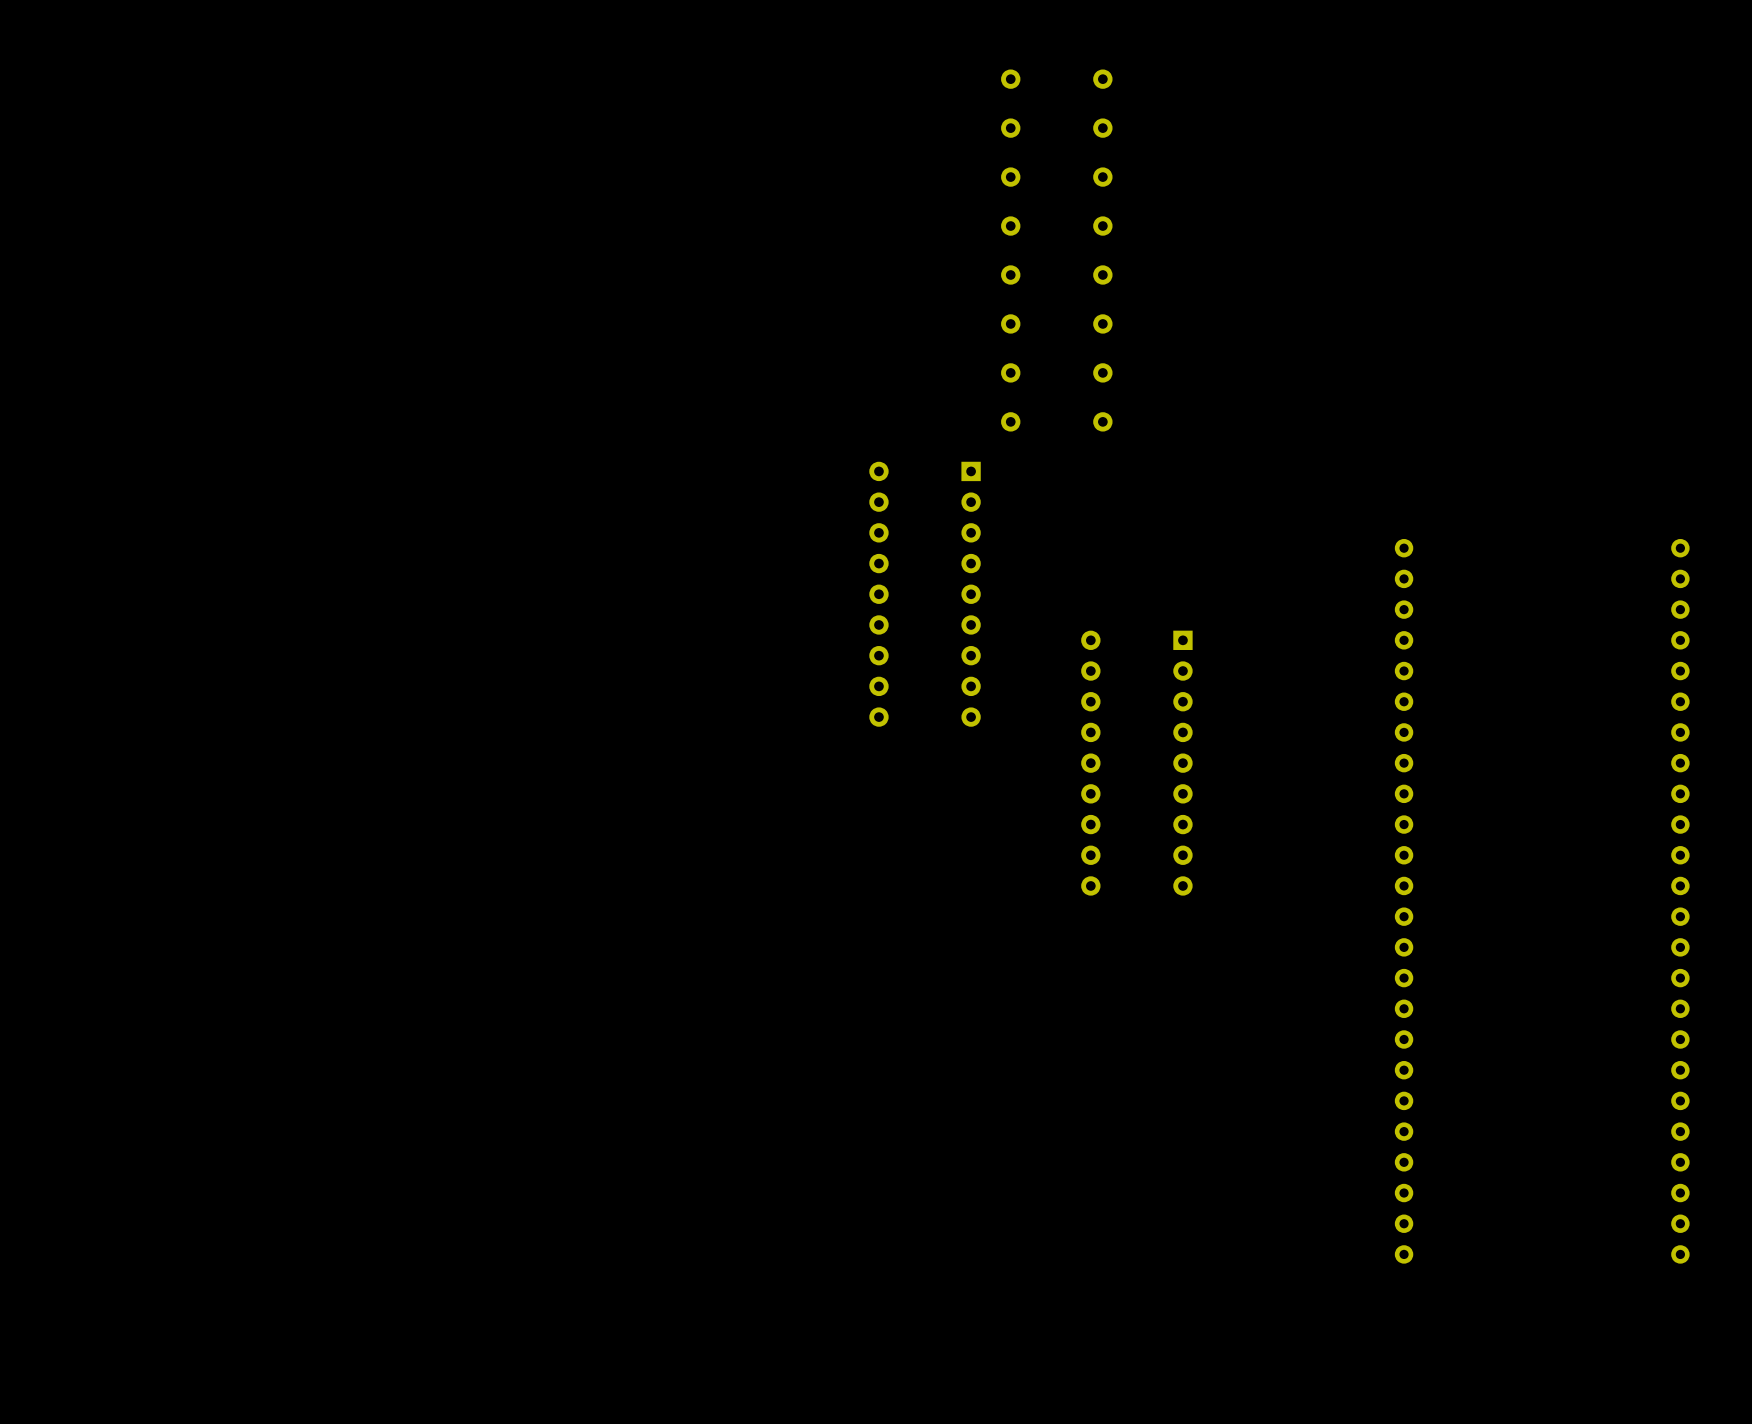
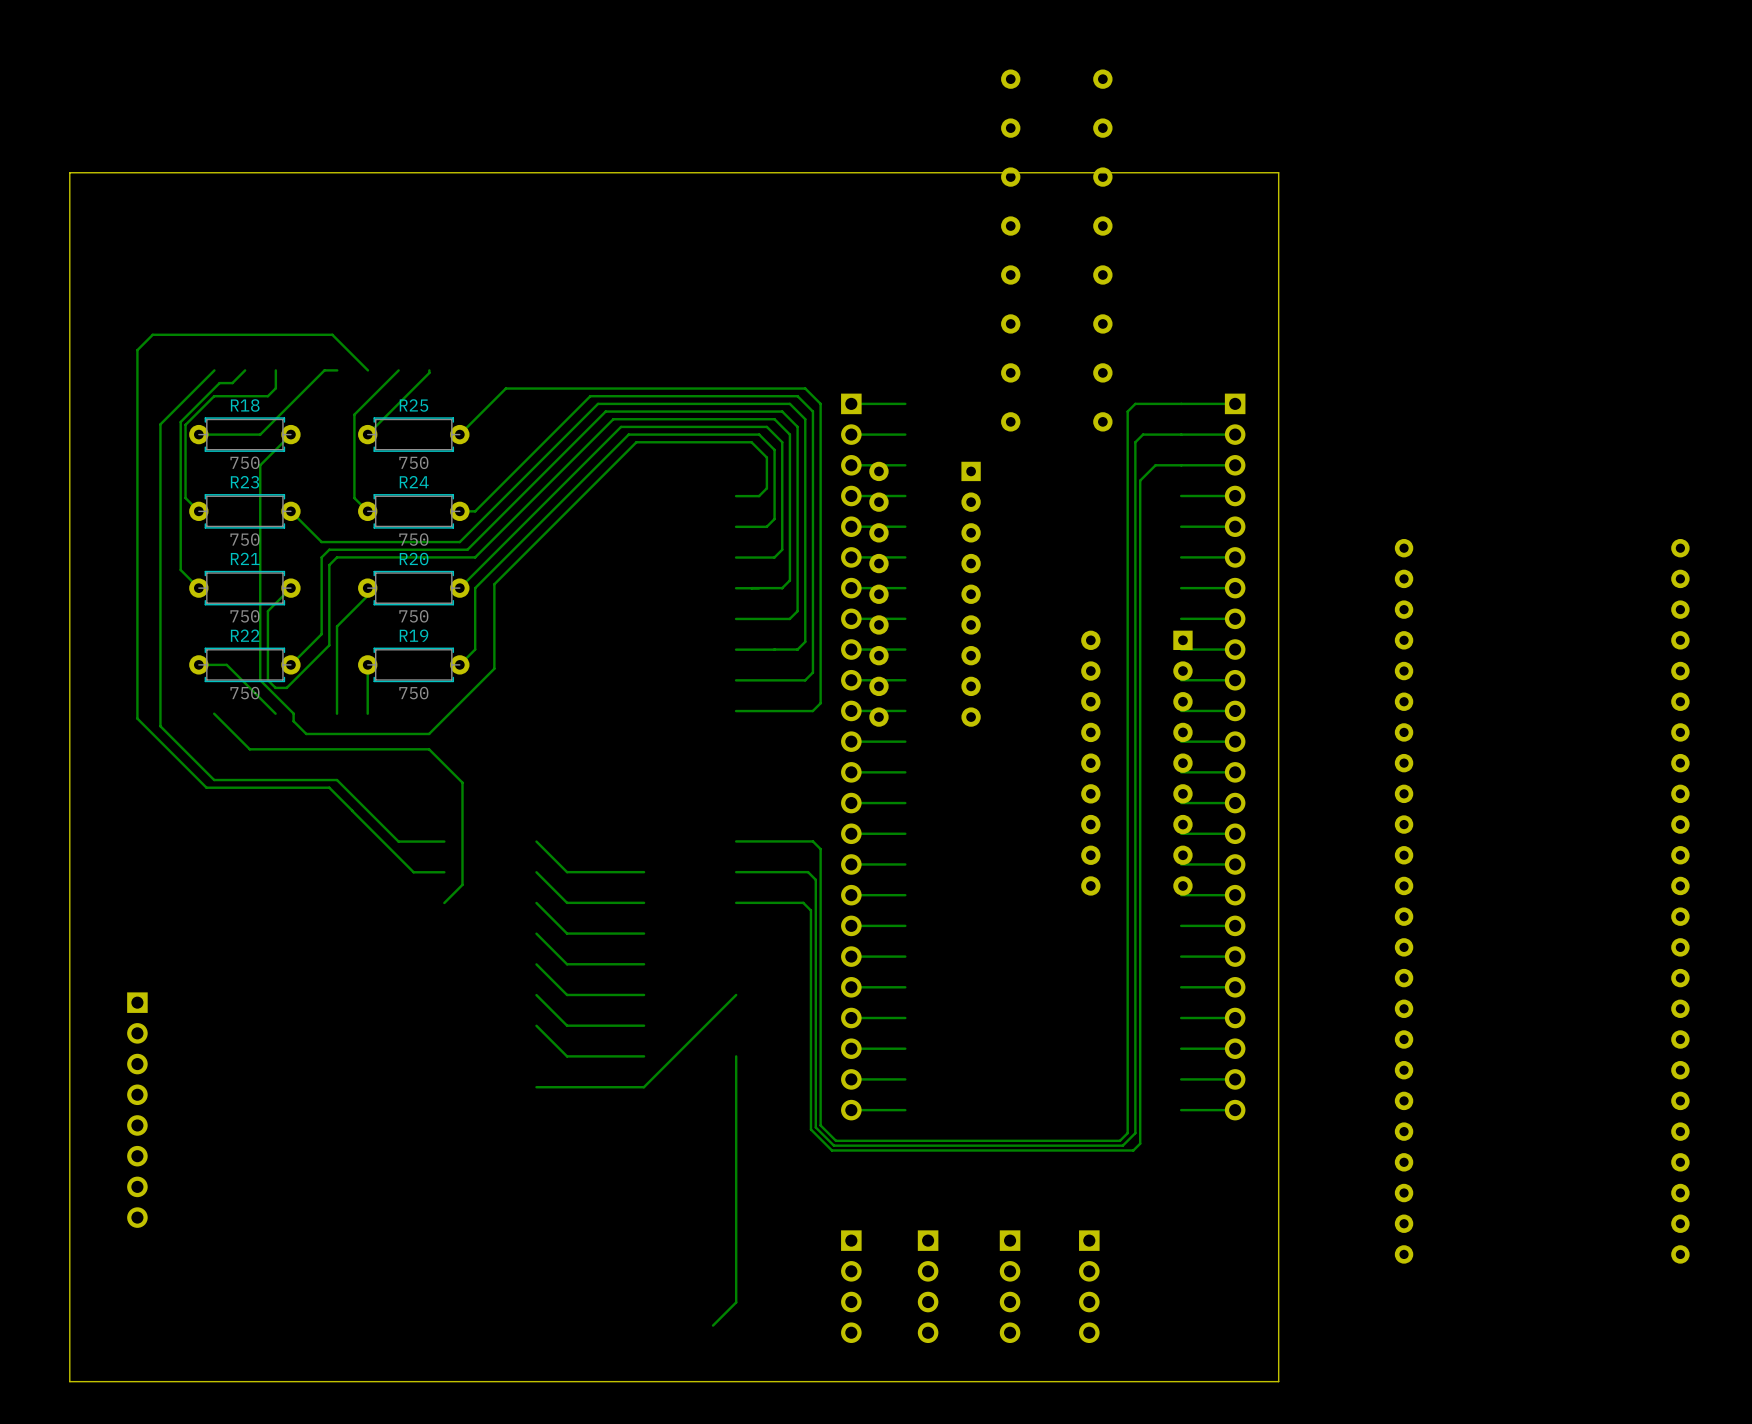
board edge: none -> (1278, 172) (69, 172) (69, 1381) (1278, 1381) (1278, 172)
track: none -> (214, 370) (160, 424) (160, 726) (214, 780) (337, 780) (398, 841) (444, 841)
track: none -> (245, 370) (232, 383) (219, 383) (180, 422) (180, 569) (198, 588)
track: none -> (275, 370) (275, 388) (267, 396) (214, 396) (185, 424) (185, 498) (198, 511)
track: none -> (337, 370) (324, 370) (260, 434) (198, 434)
track: none -> (367, 370) (332, 334) (152, 334) (137, 350) (137, 718) (206, 787) (329, 787) (413, 872) (444, 872)
track: none -> (398, 370) (354, 414) (354, 498) (367, 511)
track: none -> (429, 370) (429, 372) (367, 434)
track: none -> (905, 403) (851, 403)
track: none -> (1235, 403) (1135, 403) (1127, 411) (1127, 1133) (1120, 1140) (835, 1140) (820, 1125) (820, 849) (812, 841) (736, 841)
R18: none -> 750 (244, 434)
track: none -> (290, 434) (260, 465) (260, 680) (293, 713) (293, 721) (306, 733) (429, 733) (494, 668) (494, 584) (636, 442) (751, 442) (766, 457) (766, 488) (759, 496) (736, 496)
R25: none -> 750 (413, 434)
track: none -> (459, 434) (505, 388) (805, 388) (820, 403) (820, 703) (812, 711) (736, 711)
track: none -> (905, 434) (851, 434)
track: none -> (1235, 434) (1143, 434) (1135, 442) (1135, 1133) (1122, 1145) (833, 1145) (815, 1127) (815, 879) (808, 872) (736, 872)
track: none -> (905, 465) (851, 465)
track: none -> (1235, 465) (1155, 465) (1140, 480) (1140, 1143) (1133, 1150) (831, 1150) (810, 1129) (810, 910) (803, 902) (736, 902)
track: none -> (905, 496) (851, 496)
track: none -> (1235, 496) (1181, 496)
R23: none -> 750 (244, 511)
track: none -> (290, 511) (321, 542) (459, 542) (598, 403) (789, 403) (805, 419) (805, 641) (797, 649)
R24: none -> 750 (413, 511)
track: none -> (459, 511) (475, 511) (590, 396) (797, 396) (812, 411) (812, 672) (805, 680) (736, 680)
track: none -> (736, 526) (766, 526) (774, 519) (774, 449) (759, 434) (628, 434) (475, 588) (475, 649) (459, 664)
track: none -> (905, 526) (851, 526)
track: none -> (1235, 526) (1181, 526)
track: none -> (736, 557) (774, 557) (782, 549) (782, 442) (766, 426) (621, 426) (459, 588)
track: none -> (905, 557) (851, 557)
track: none -> (1235, 557) (1181, 557)
R21: none -> 750 (244, 588)
track: none -> (290, 588) (267, 611) (267, 680) (275, 687) (286, 687) (329, 645) (329, 565) (337, 557) (475, 557) (613, 419) (774, 419) (789, 434) (789, 580) (782, 588)
track: none -> (367, 588) (367, 595) (337, 626) (337, 713)
R20: none -> 750 (413, 588)
track: none -> (759, 588) (736, 588)
track: none -> (782, 588) (751, 588)
track: none -> (905, 588) (851, 588)
track: none -> (1235, 588) (1181, 588)
track: none -> (736, 618) (789, 618) (797, 611) (797, 426) (782, 411) (605, 411) (467, 549) (329, 549) (321, 557) (321, 634) (290, 664)
track: none -> (905, 618) (851, 618)
track: none -> (1235, 618) (1181, 618)
track: none -> (774, 649) (736, 649)
track: none -> (797, 649) (774, 649)
track: none -> (905, 649) (851, 649)
track: none -> (1235, 649) (1181, 649)
track: none -> (198, 664) (226, 664) (275, 713)
R22: none -> 750 (244, 664)
track: none -> (367, 664) (367, 713)
R19: none -> 750 (413, 664)
track: none -> (905, 680) (851, 680)
track: none -> (1235, 680) (1181, 680)
track: none -> (905, 710) (851, 710)
track: none -> (1235, 710) (1181, 710)
track: none -> (214, 713) (249, 749) (429, 749) (462, 782) (462, 884) (444, 902)
track: none -> (905, 741) (851, 741)
track: none -> (1235, 741) (1181, 741)
part: none -> (851, 757)
part: none -> (1235, 757)
track: none -> (905, 772) (851, 772)
track: none -> (1235, 772) (1181, 772)
track: none -> (905, 803) (851, 803)
track: none -> (1235, 803) (1181, 803)
track: none -> (905, 833) (851, 833)
track: none -> (1235, 833) (1181, 833)
track: none -> (536, 841) (567, 872) (644, 872)
track: none -> (905, 864) (851, 864)
track: none -> (1235, 864) (1181, 864)
track: none -> (536, 872) (567, 902) (644, 902)
track: none -> (905, 895) (851, 895)
track: none -> (1235, 895) (1181, 895)
track: none -> (536, 902) (567, 933) (644, 933)
track: none -> (905, 925) (851, 925)
track: none -> (1235, 925) (1181, 925)
track: none -> (536, 933) (567, 964) (644, 964)
track: none -> (905, 956) (851, 956)
track: none -> (1235, 956) (1181, 956)
track: none -> (536, 964) (567, 994) (644, 994)
track: none -> (905, 987) (851, 987)
track: none -> (1235, 987) (1181, 987)
track: none -> (736, 994) (643, 1087) (536, 1087)
track: none -> (536, 995) (567, 1025) (644, 1025)
track: none -> (905, 1018) (851, 1018)
track: none -> (1235, 1018) (1181, 1018)
track: none -> (536, 1025) (567, 1056) (644, 1056)
track: none -> (905, 1048) (851, 1048)
track: none -> (1235, 1048) (1181, 1048)
track: none -> (736, 1056) (736, 1302) (713, 1325)
track: none -> (905, 1079) (851, 1079)
track: none -> (1235, 1079) (1181, 1079)
part: none -> (137, 1110)
track: none -> (905, 1110) (851, 1110)
track: none -> (1235, 1110) (1181, 1110)
part: none -> (851, 1286)
part: none -> (928, 1286)
part: none -> (1010, 1286)
part: none -> (1089, 1286)

